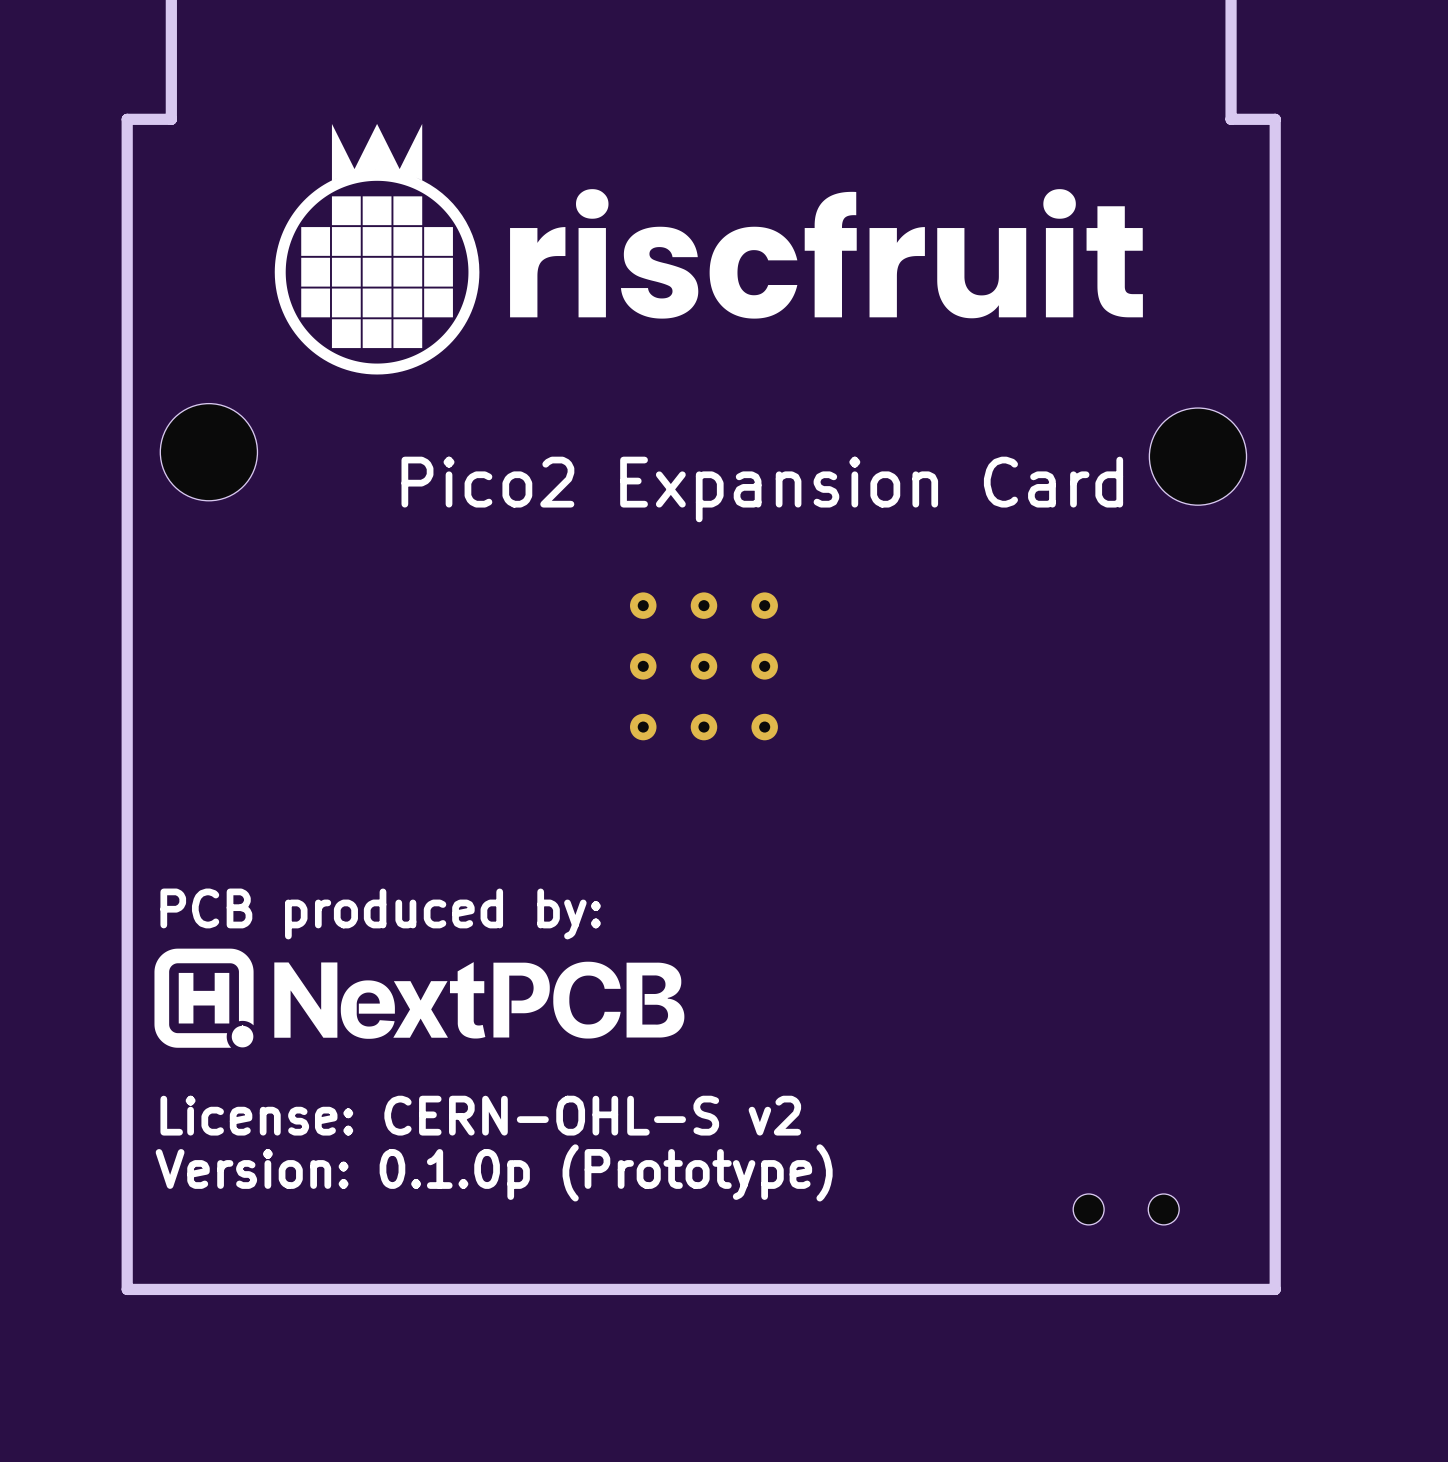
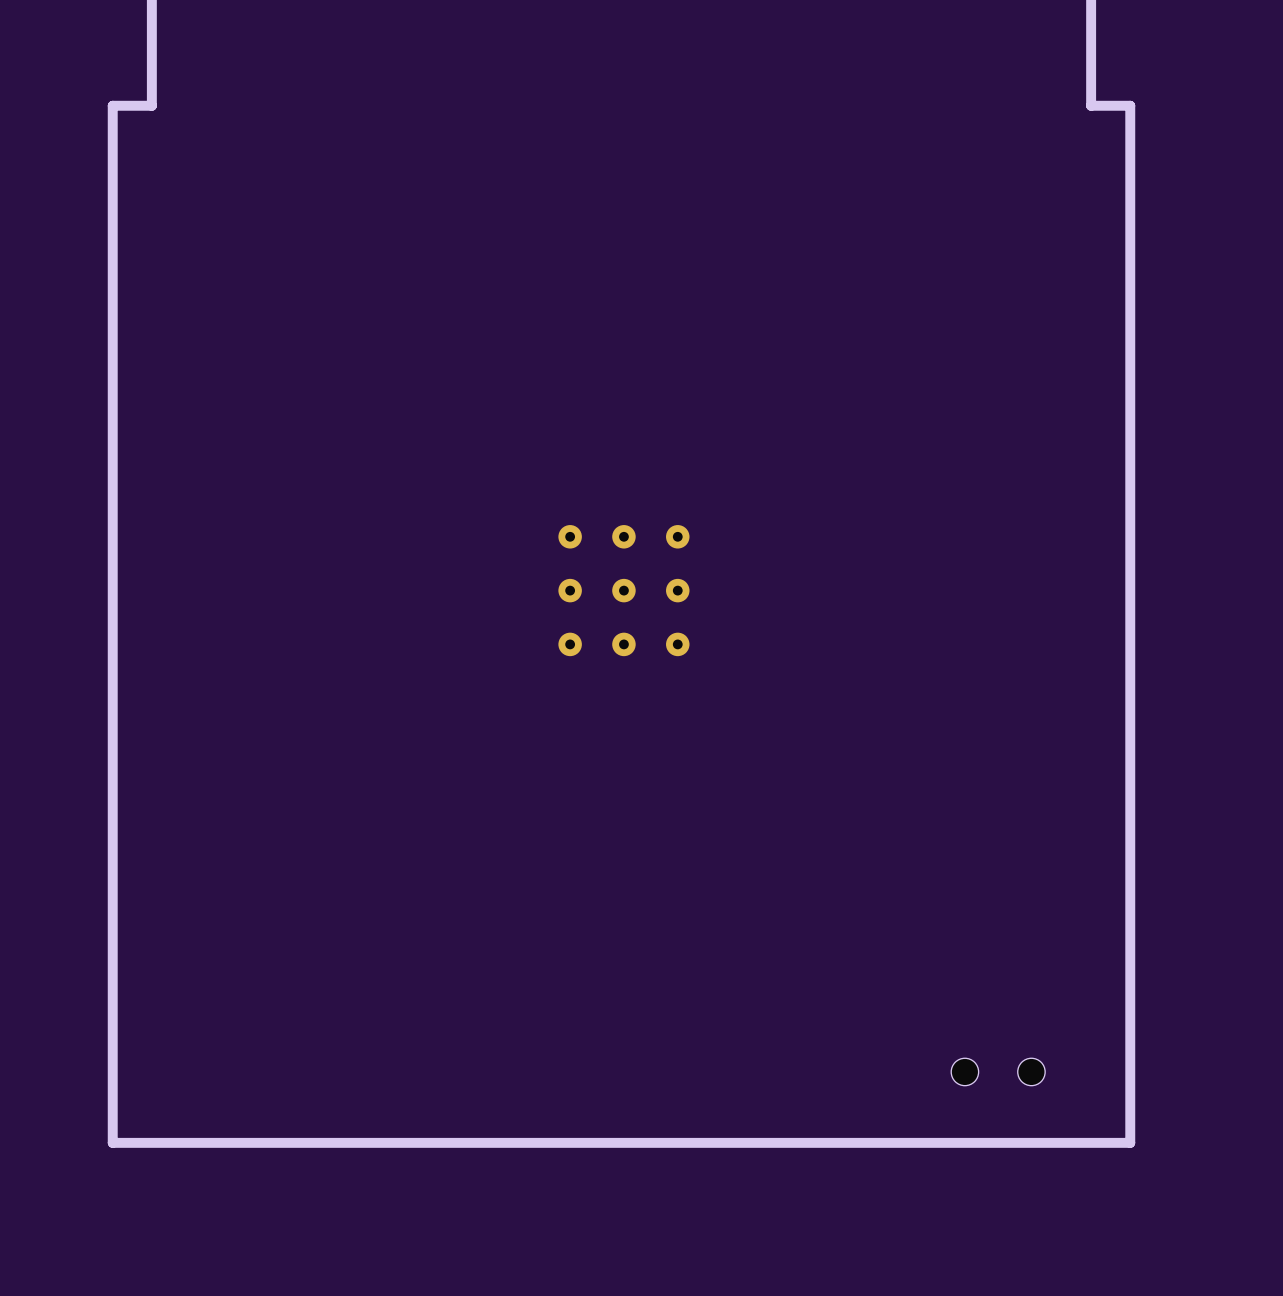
drawing: [274, 123, 1143, 375] -> none
part: (208, 452) -> none
part: (1197, 456) -> none
text: Pico2 Expansion Card (762, 489) -> none
text: PCB produced by: (380, 913) -> none
drawing: [154, 948, 685, 1048] -> none
text: License: CERN-OHL-S v2 (480, 1115) -> none
text: Version: 0.1.0p (Prototype) (494, 1172) -> none

